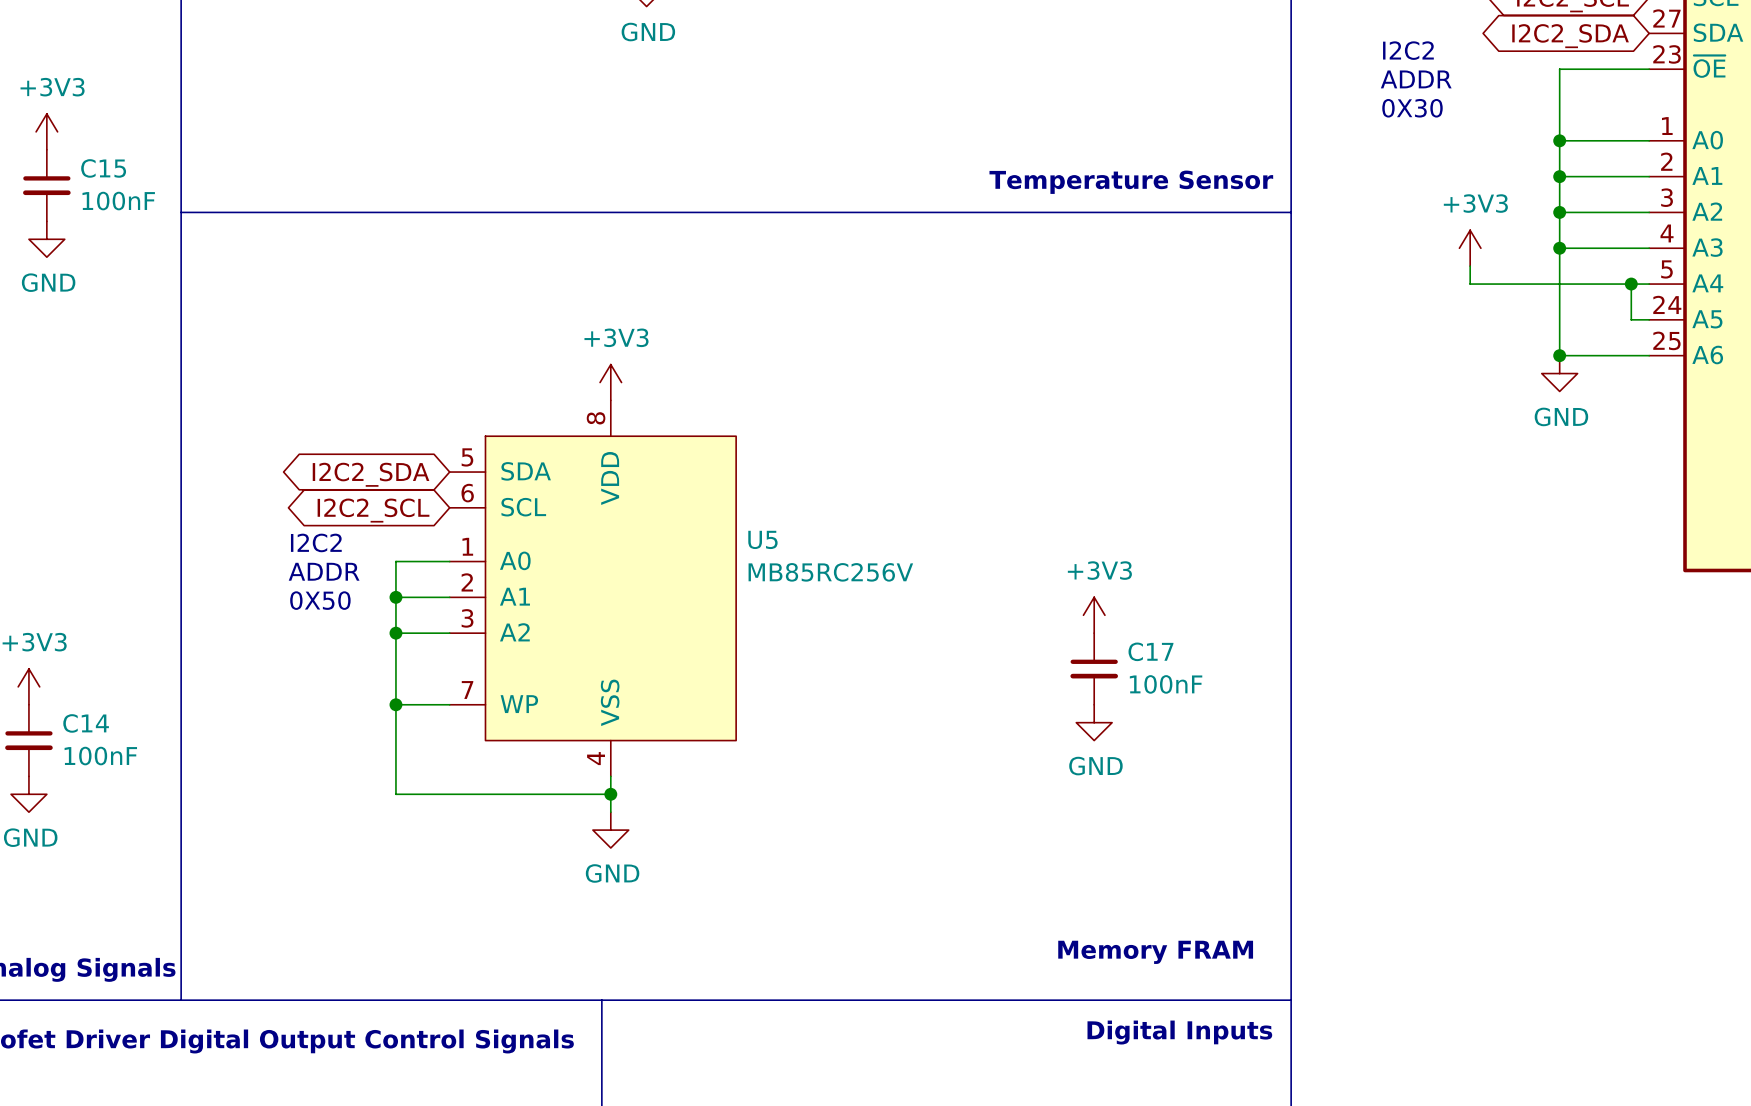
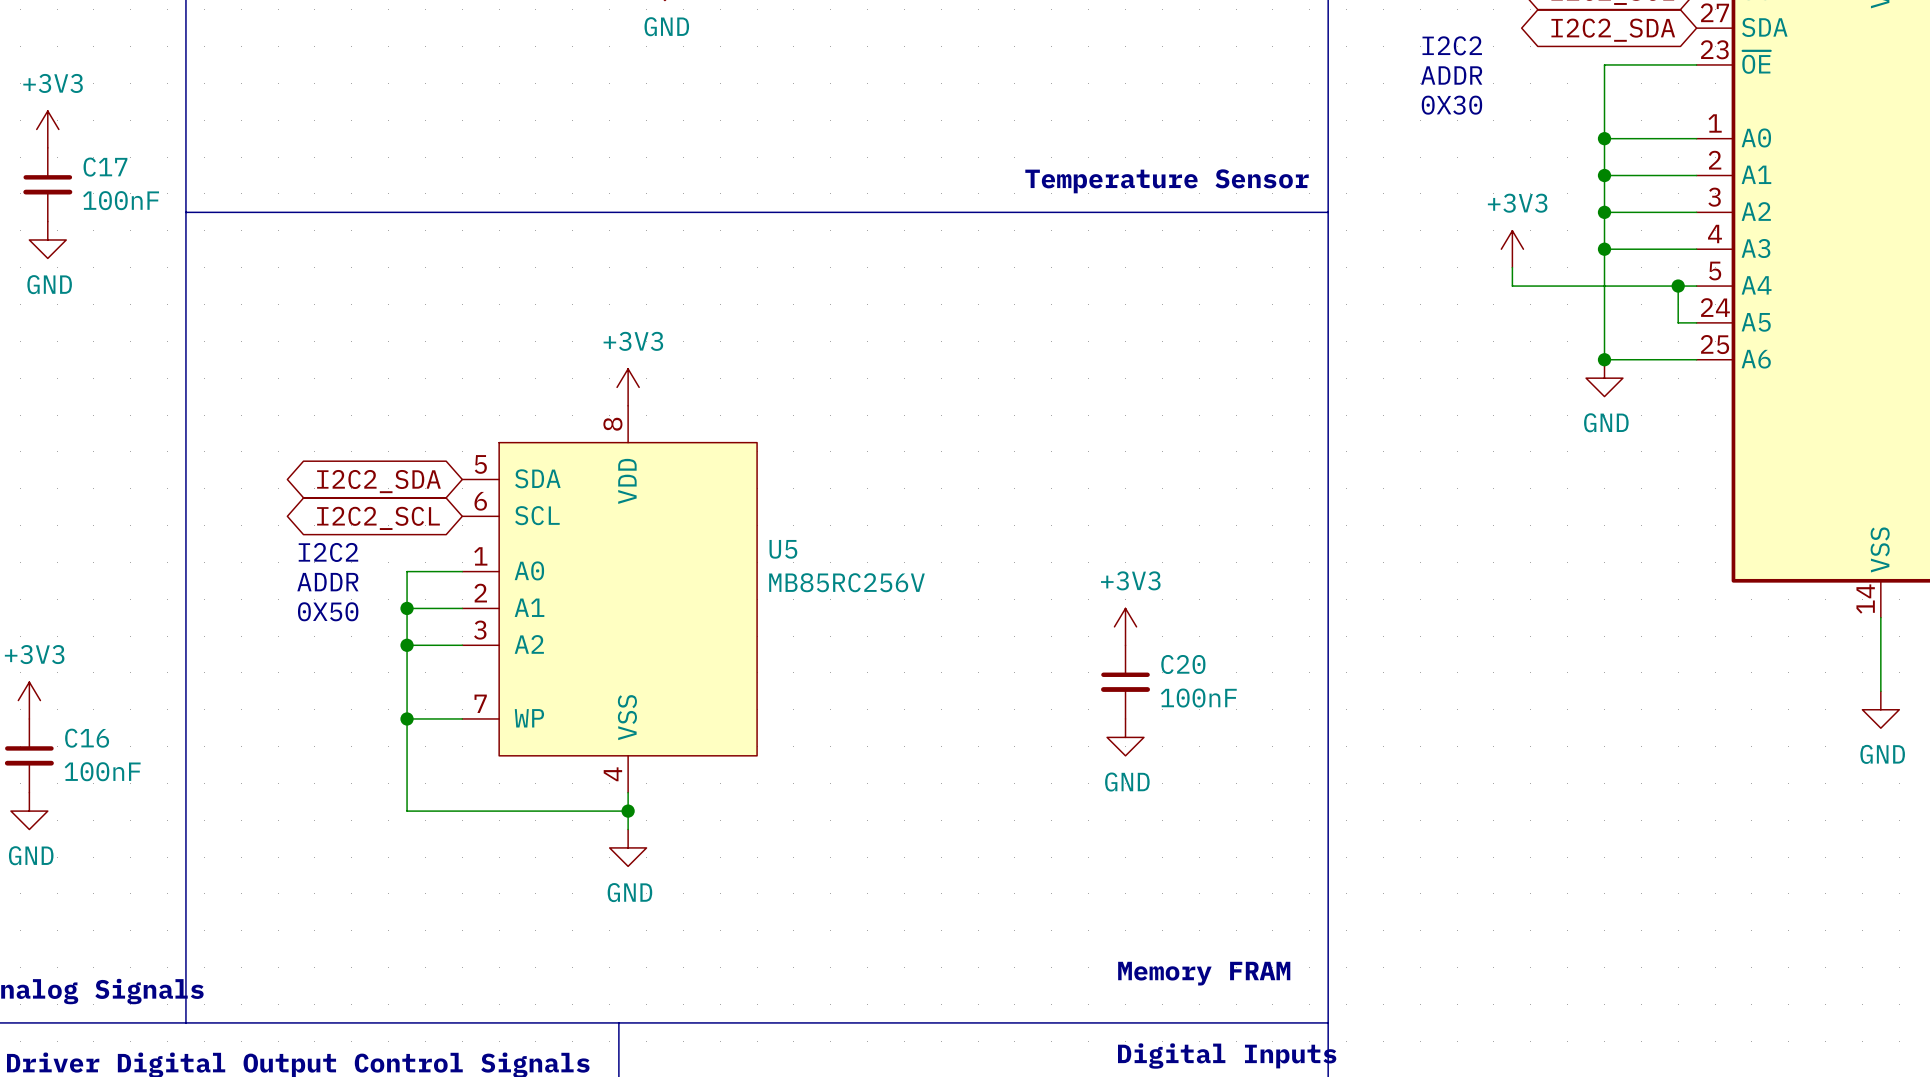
C15 name: C15 (103, 168) -> C17 (105, 167)
C17 name: C17 (1150, 651) -> C20 (1183, 664)
C14 name: C14 (86, 723) -> C16 (87, 738)

